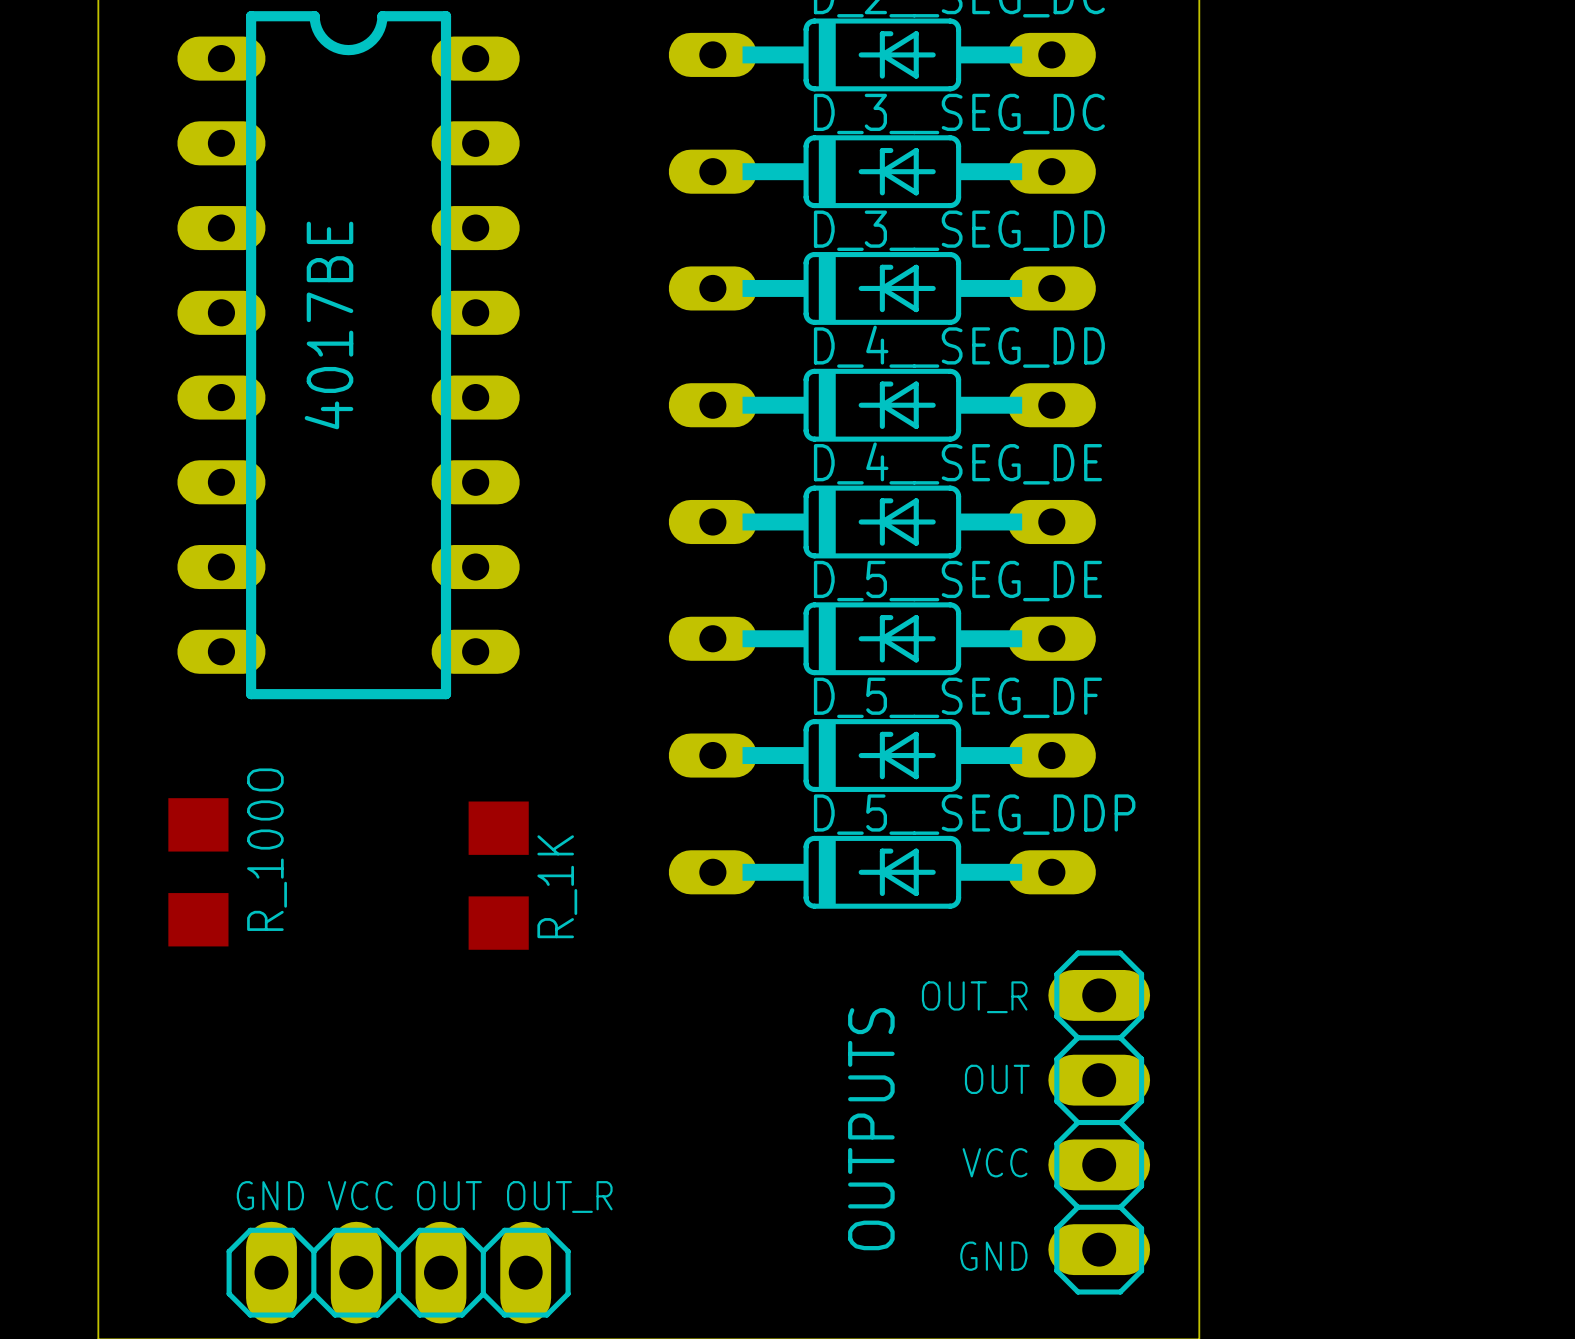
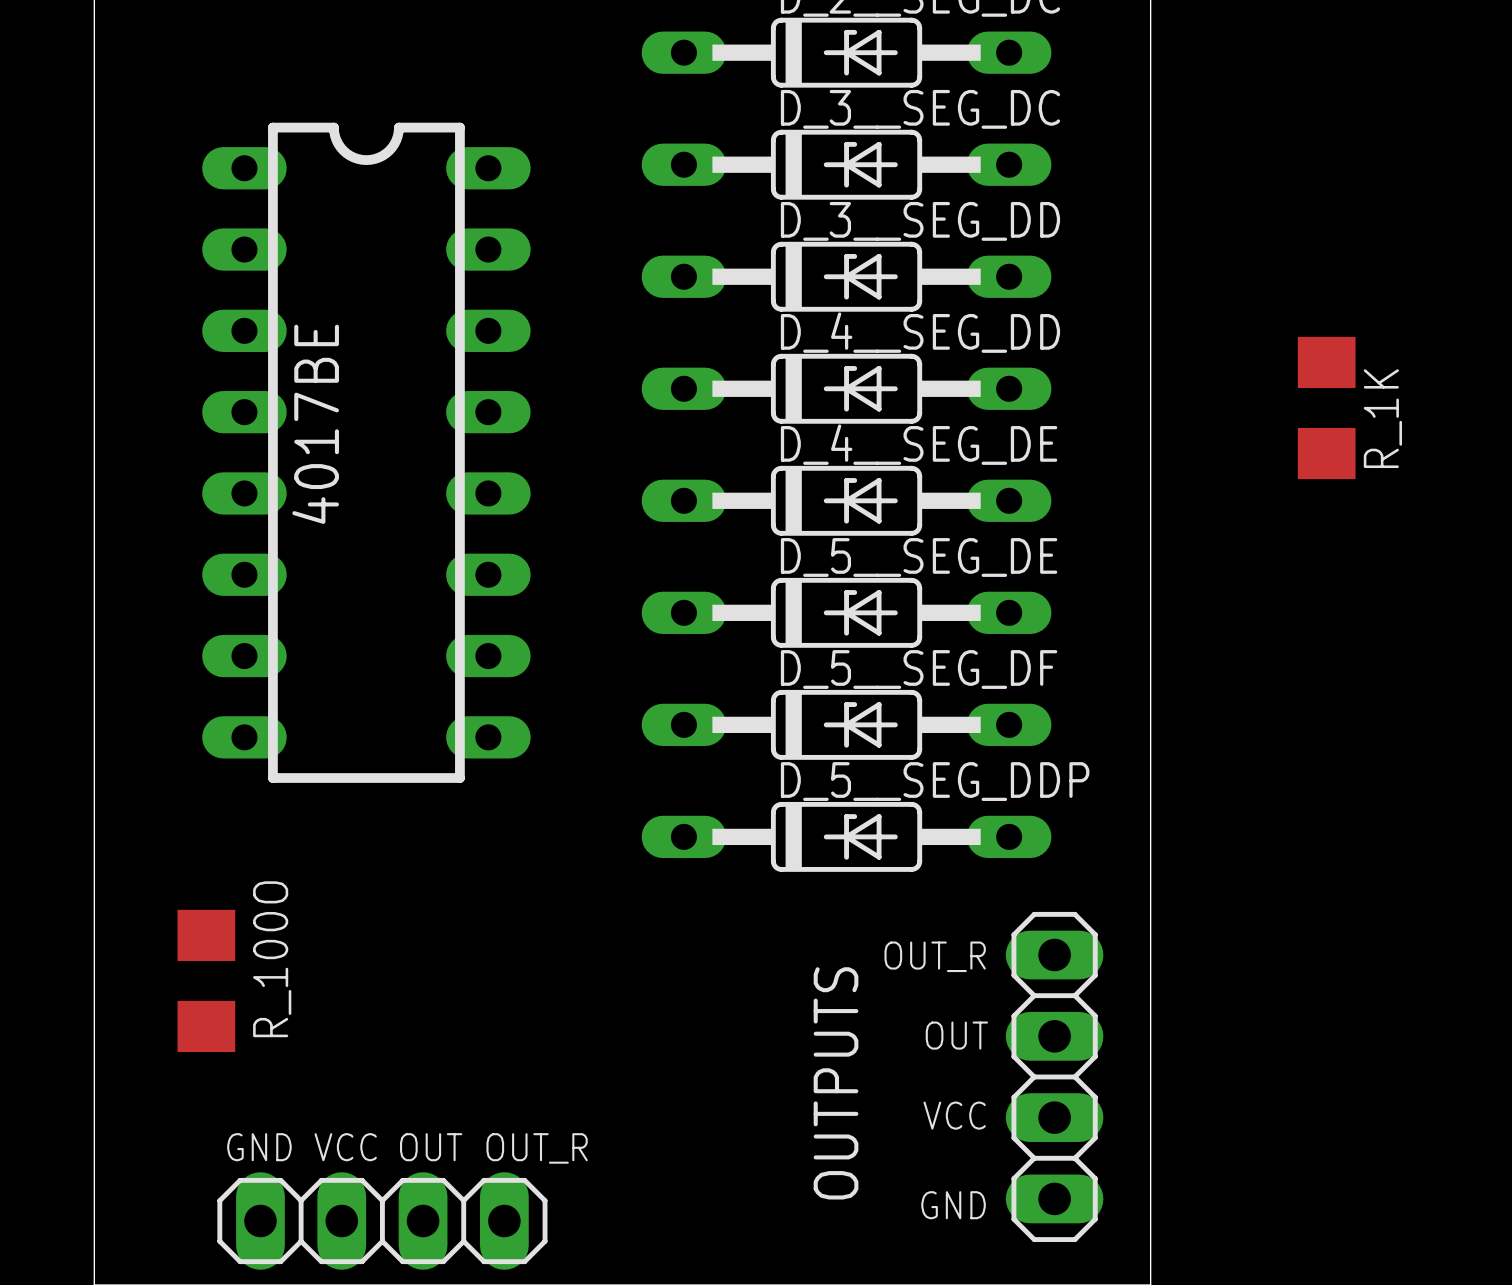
4017BE name position: 4017BE (328, 325) -> 4017BE (315, 424)
4017BE position: (348, 355) -> (366, 452)
R_100O position: (198, 872) -> (206, 980)
R_1K position: (498, 875) -> (1326, 407)

